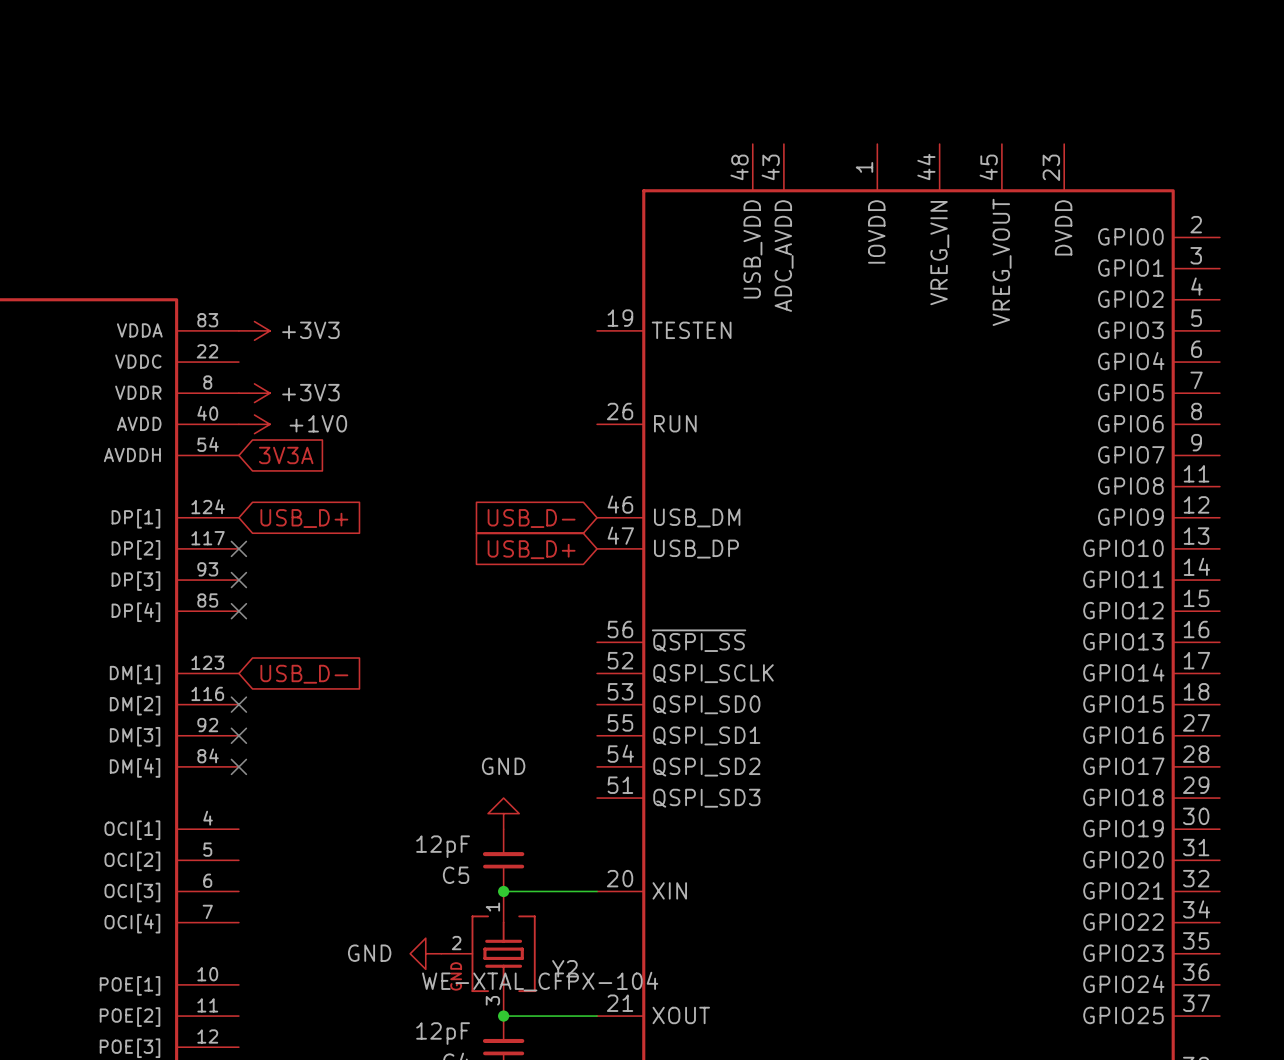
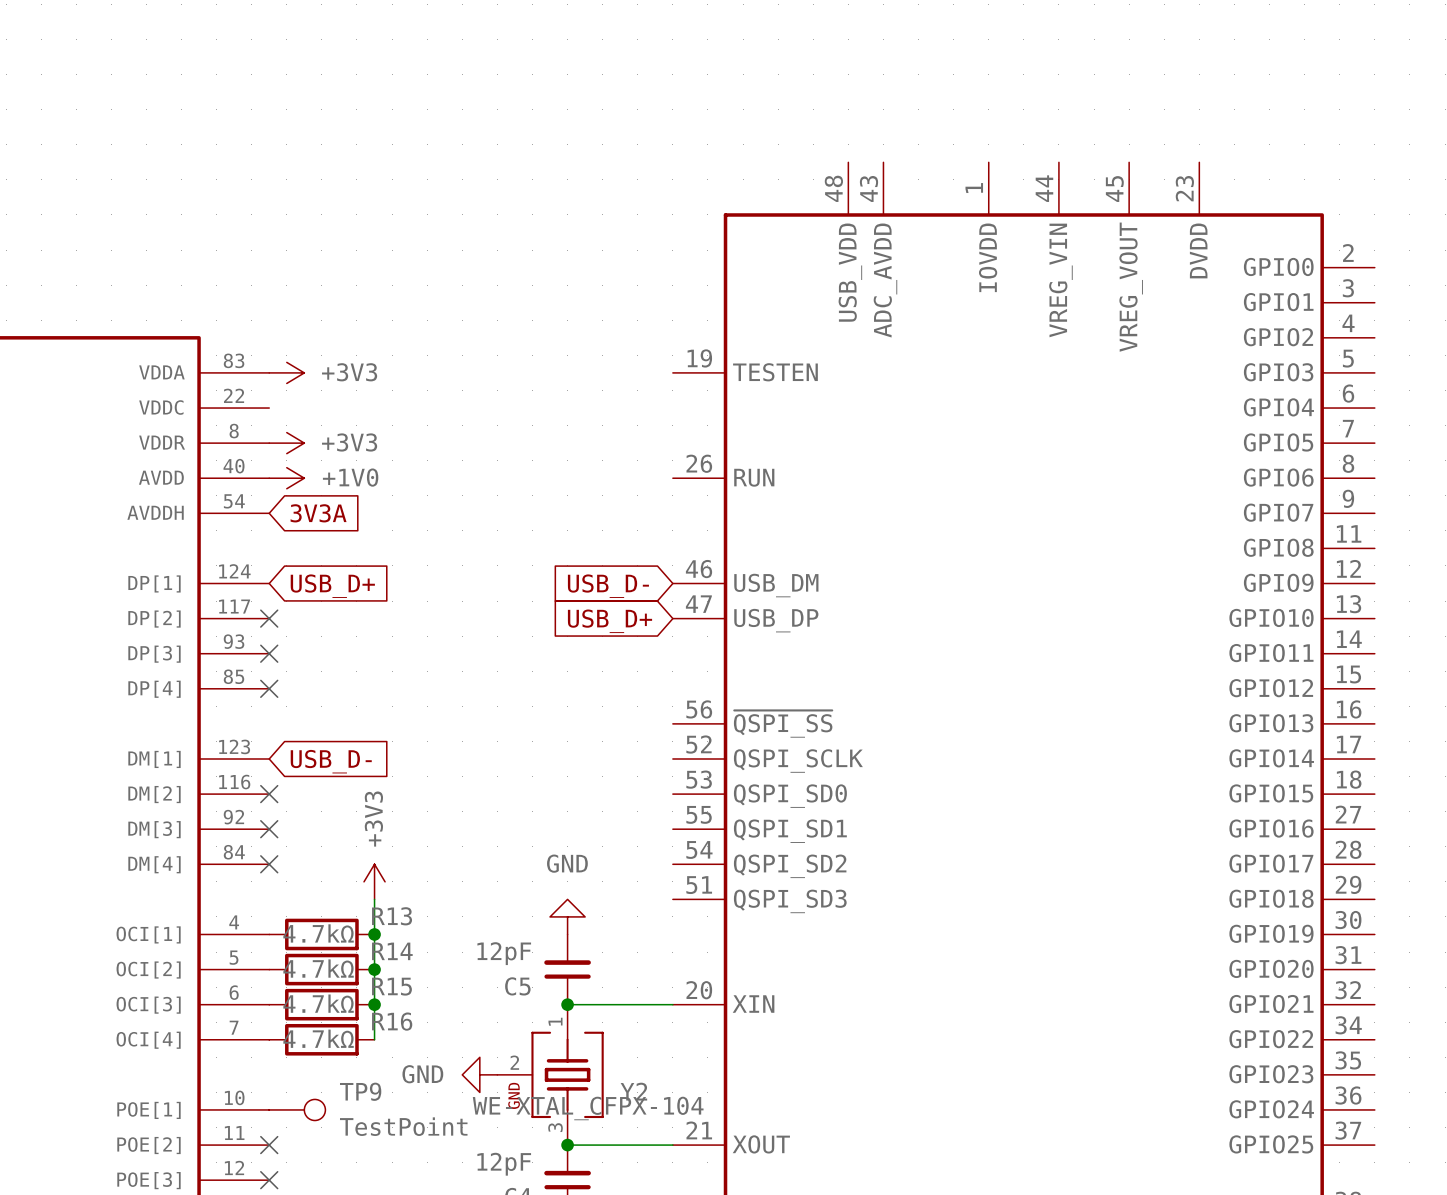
power symbol: none -> +3V3 (374, 881)
wire: none -> (374, 899) (374, 1039)
R13: none -> 4.7kΩ (321, 934)
junction: none -> (374, 934)
R14: none -> 4.7kΩ (321, 969)
junction: none -> (374, 969)
R15: none -> 4.7kΩ (321, 1004)
junction: none -> (374, 1004)
R16: none -> 4.7kΩ (321, 1039)
TP9: none -> TestPoint (297, 1109)
no-connect mark: none -> (269, 1145)
no-connect mark: none -> (269, 1180)

